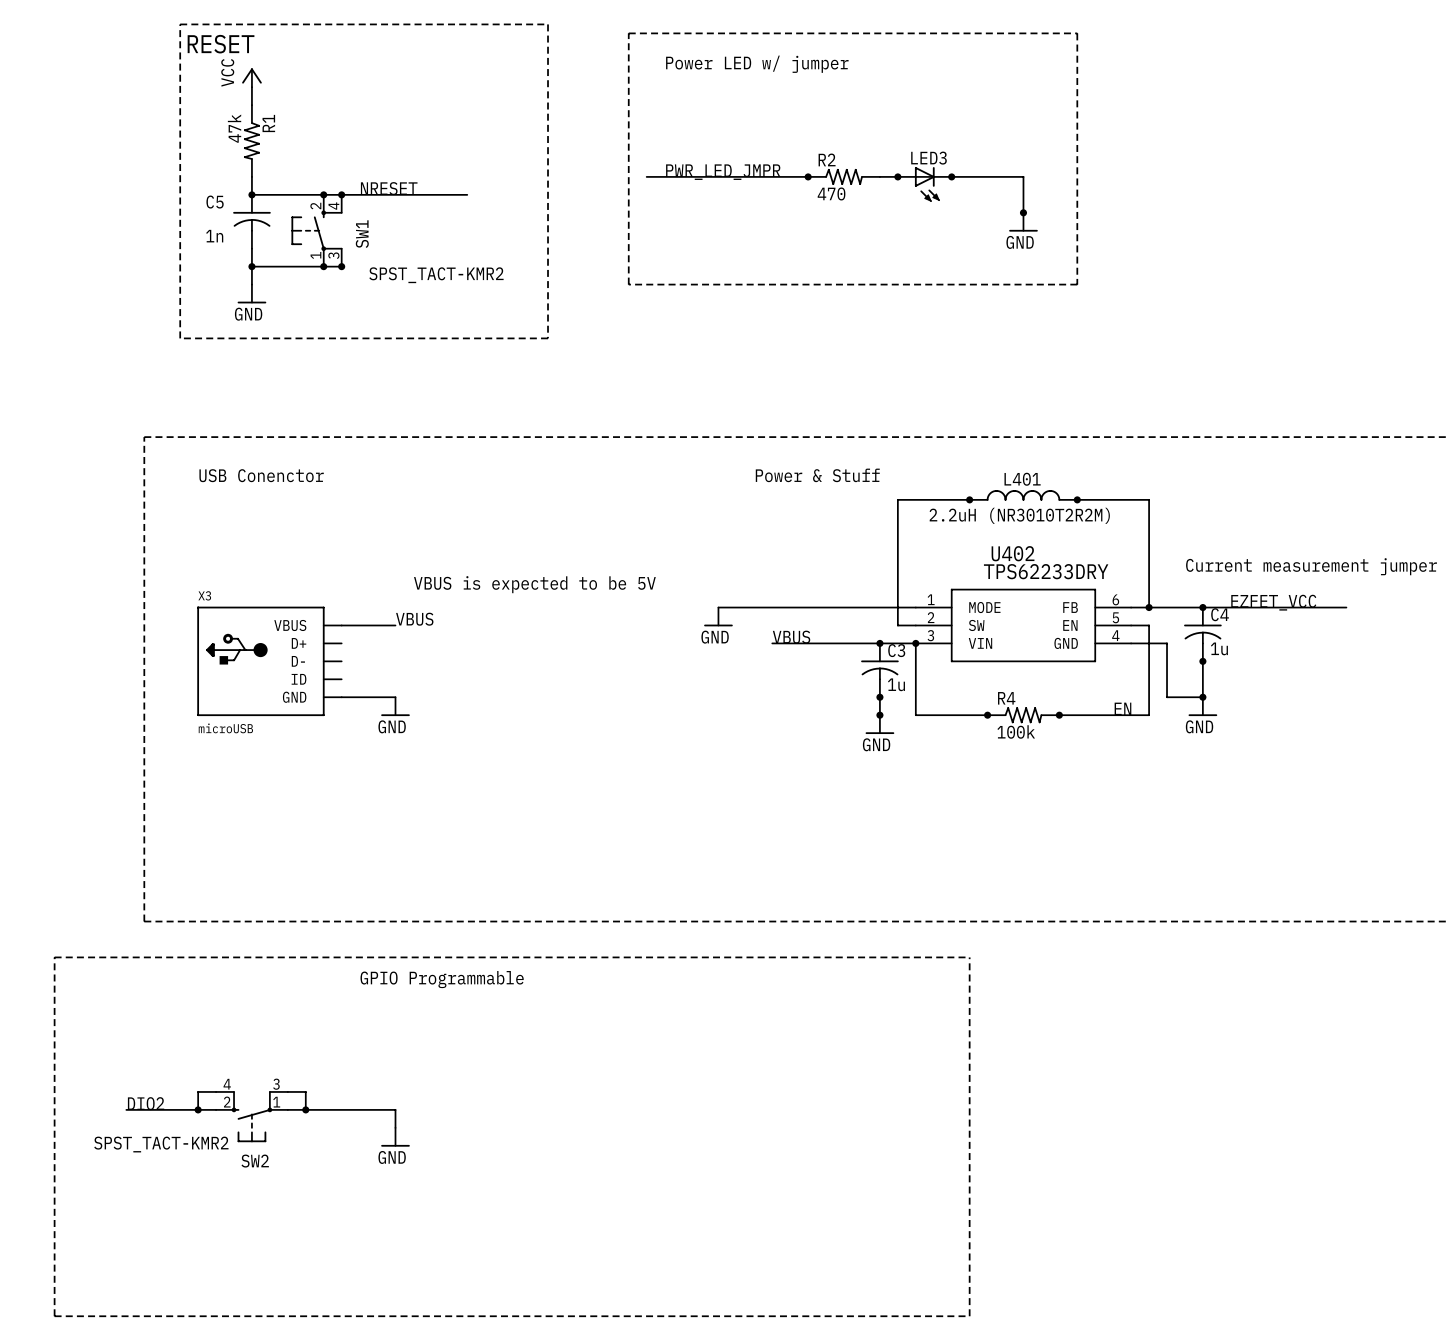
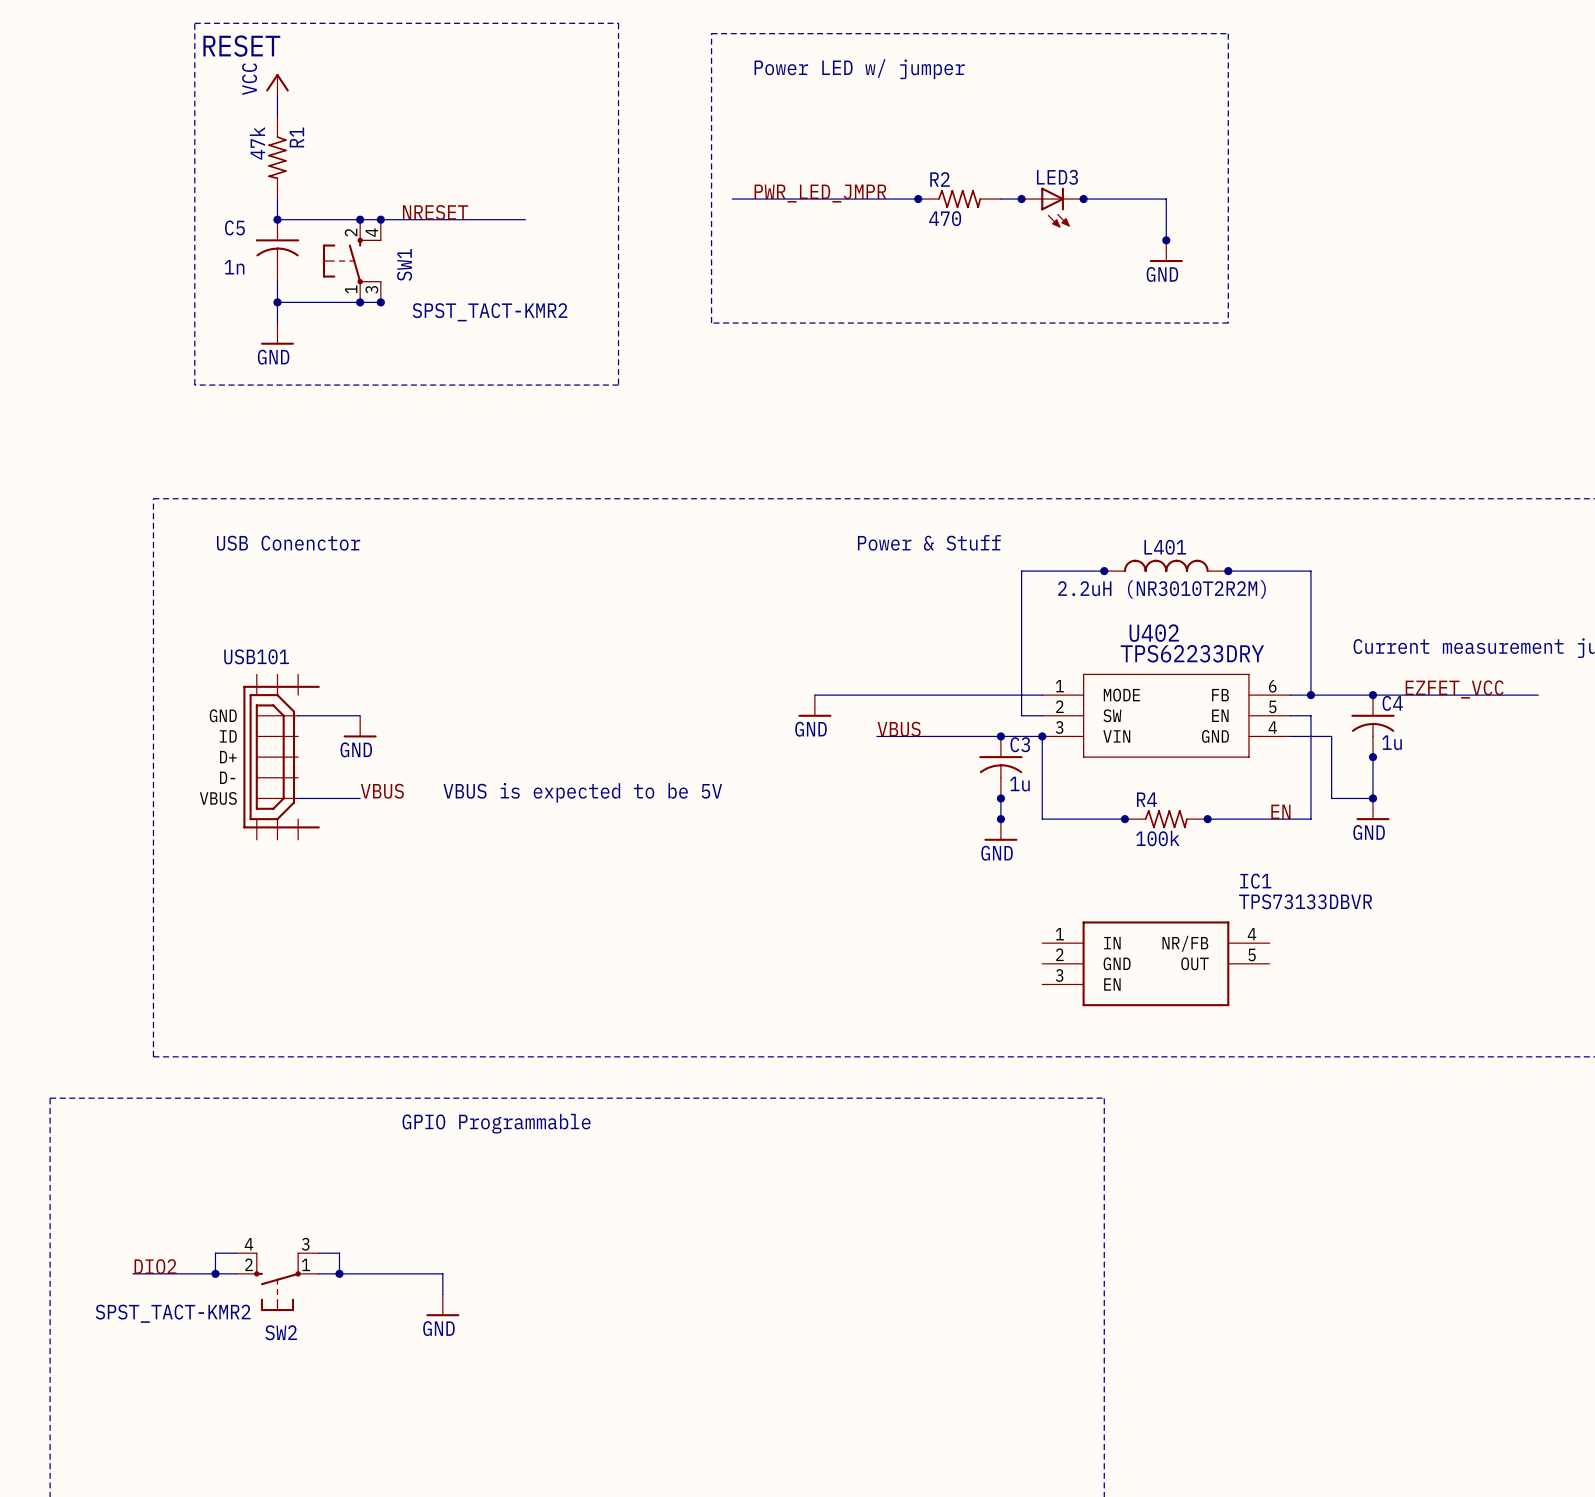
text position: VBUS is expected to be 5V (534, 584) -> VBUS is expected to be 5V (582, 792)
label position: VBUS (414, 619) -> VBUS (382, 791)
wire: (341, 625) (395, 625) -> (298, 715) (360, 715)
USB101: none -> (281, 757)
X3: microUSB (269, 661) -> none
wire: (341, 697) (395, 697) -> (298, 798) (360, 798)
power symbol position: GND (395, 706) -> GND (360, 726)
IC1: none -> TPS73133DBVR (1155, 963)

